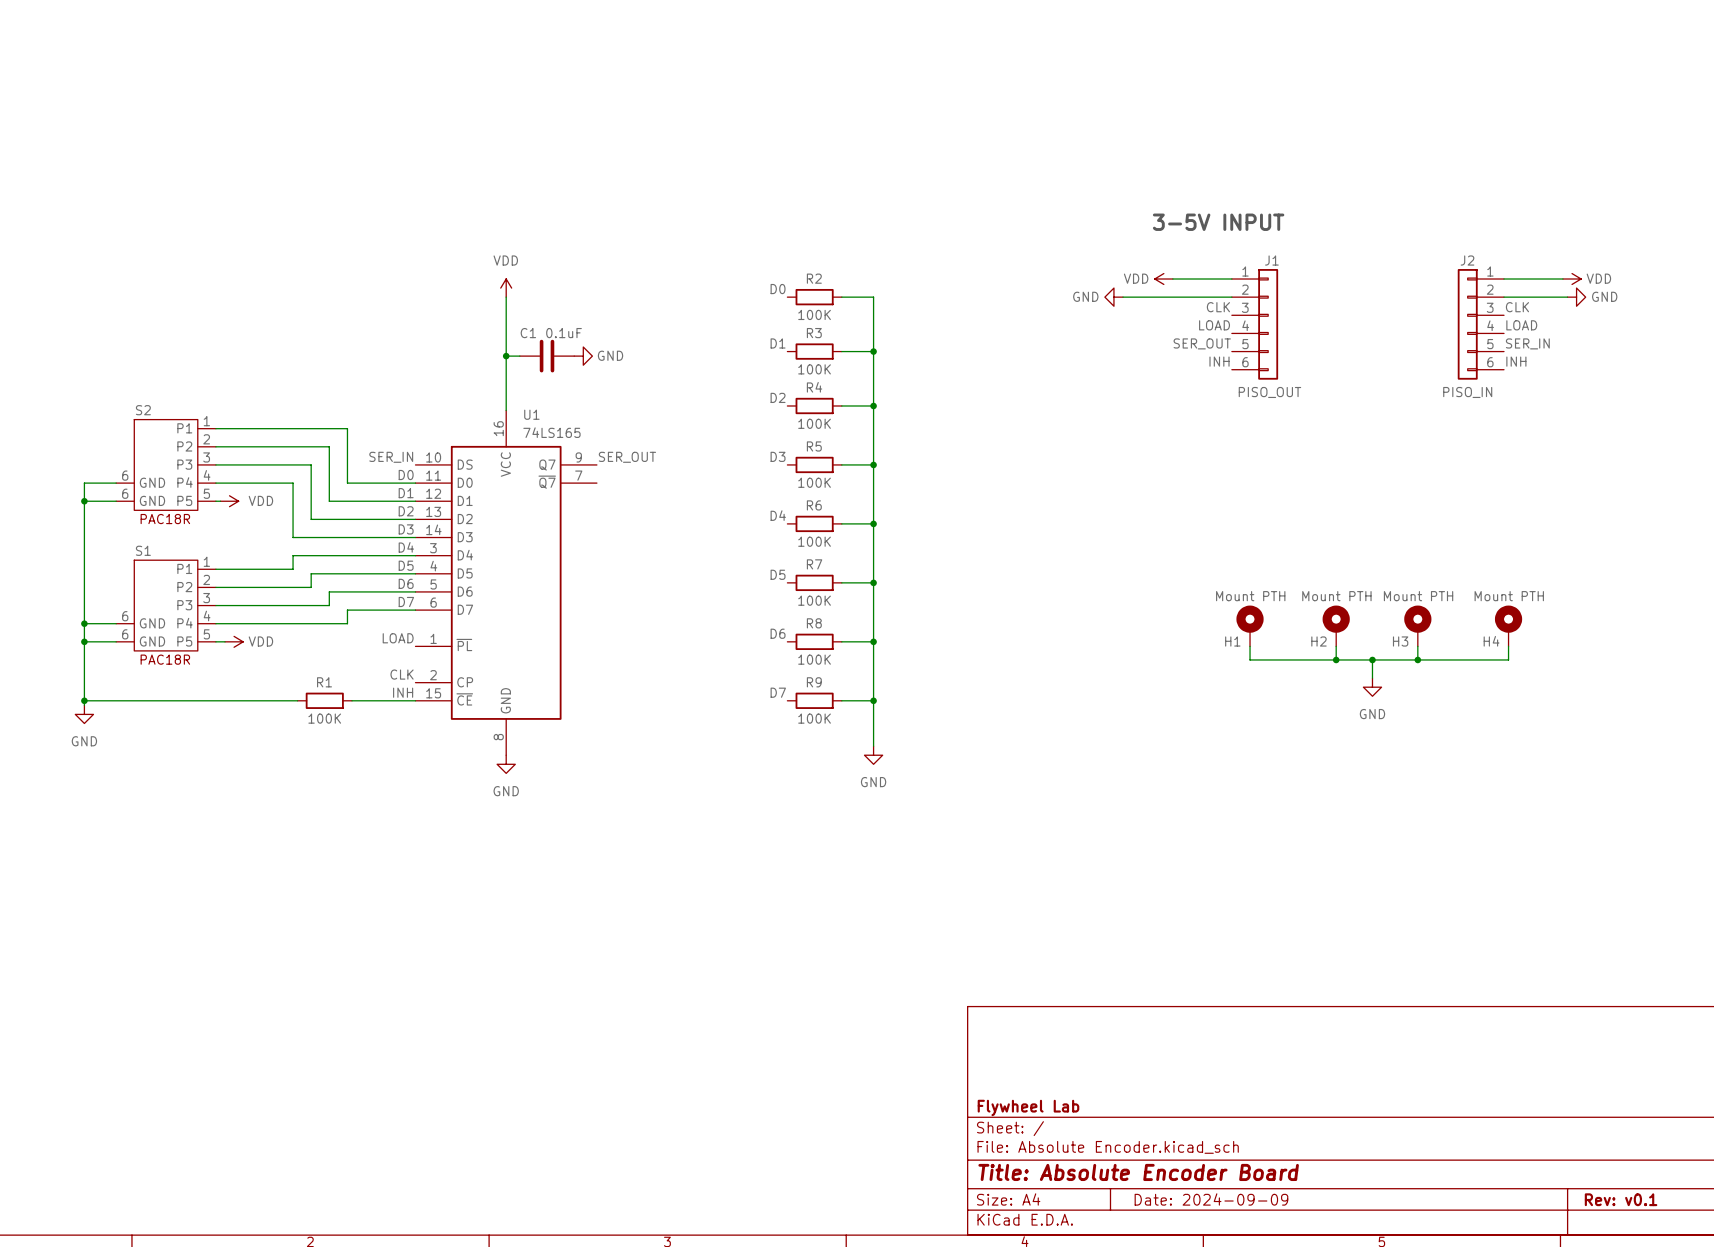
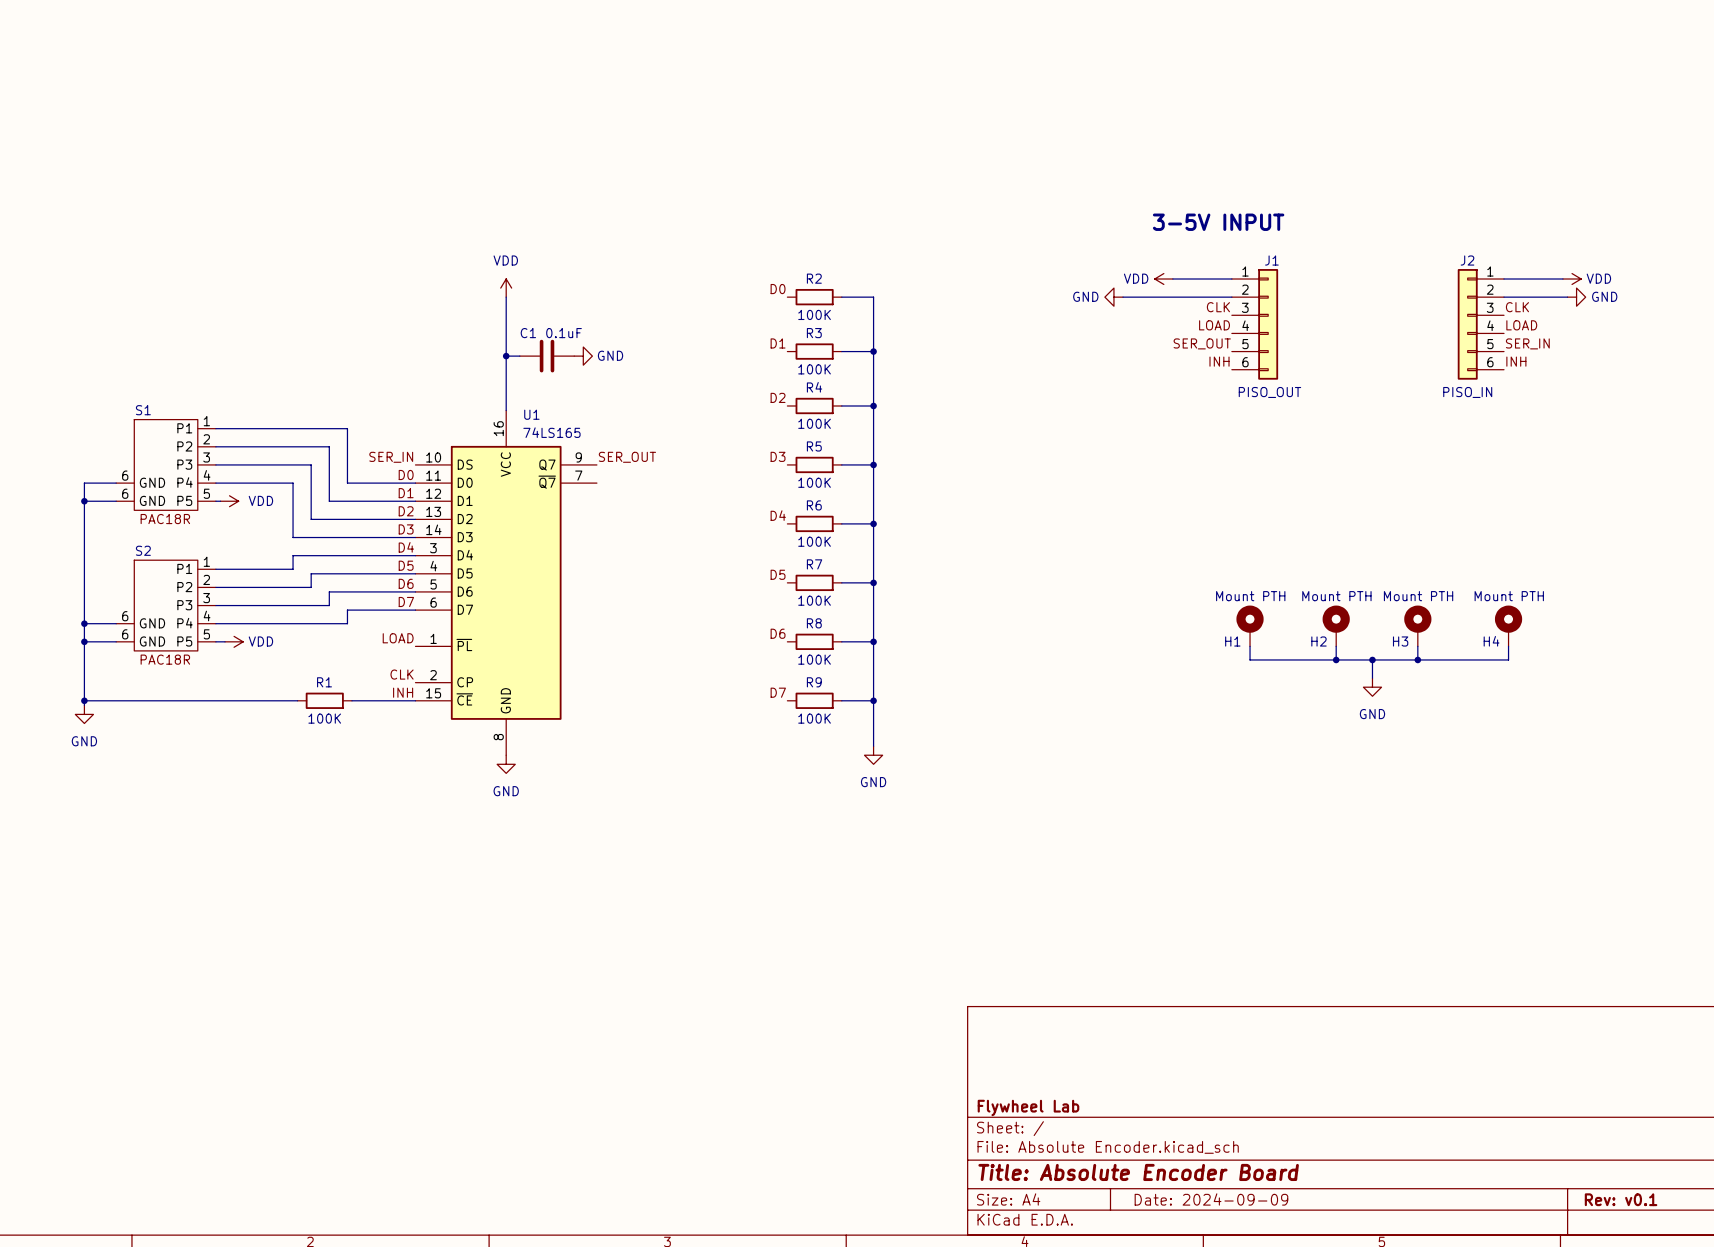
S2 name: S2 (143, 410) -> S1 (143, 410)
S1 name: S1 (143, 550) -> S2 (143, 550)

